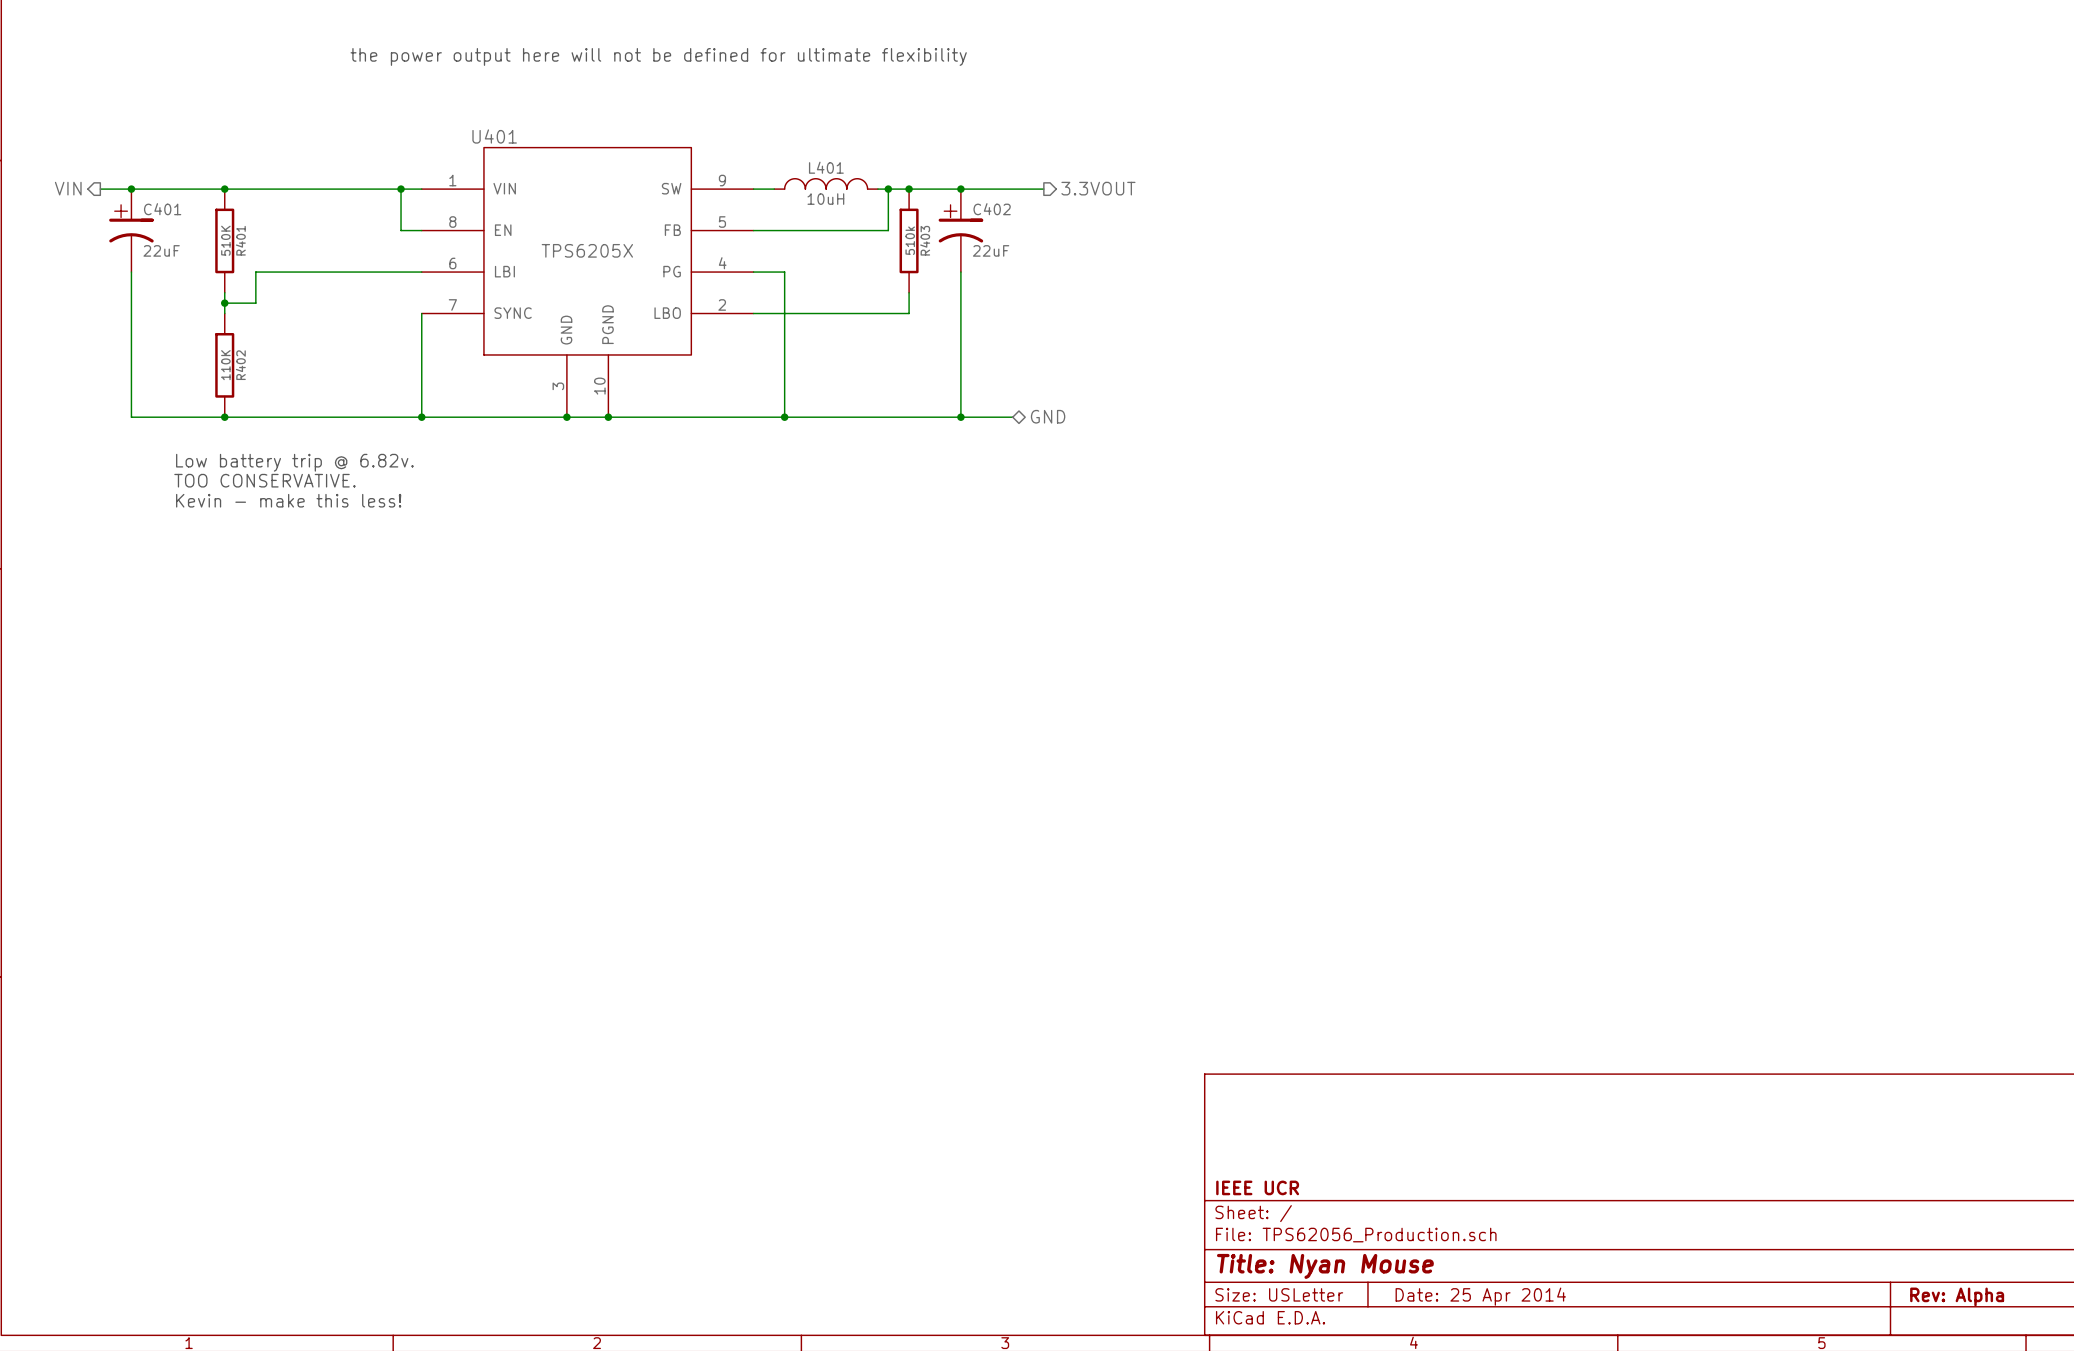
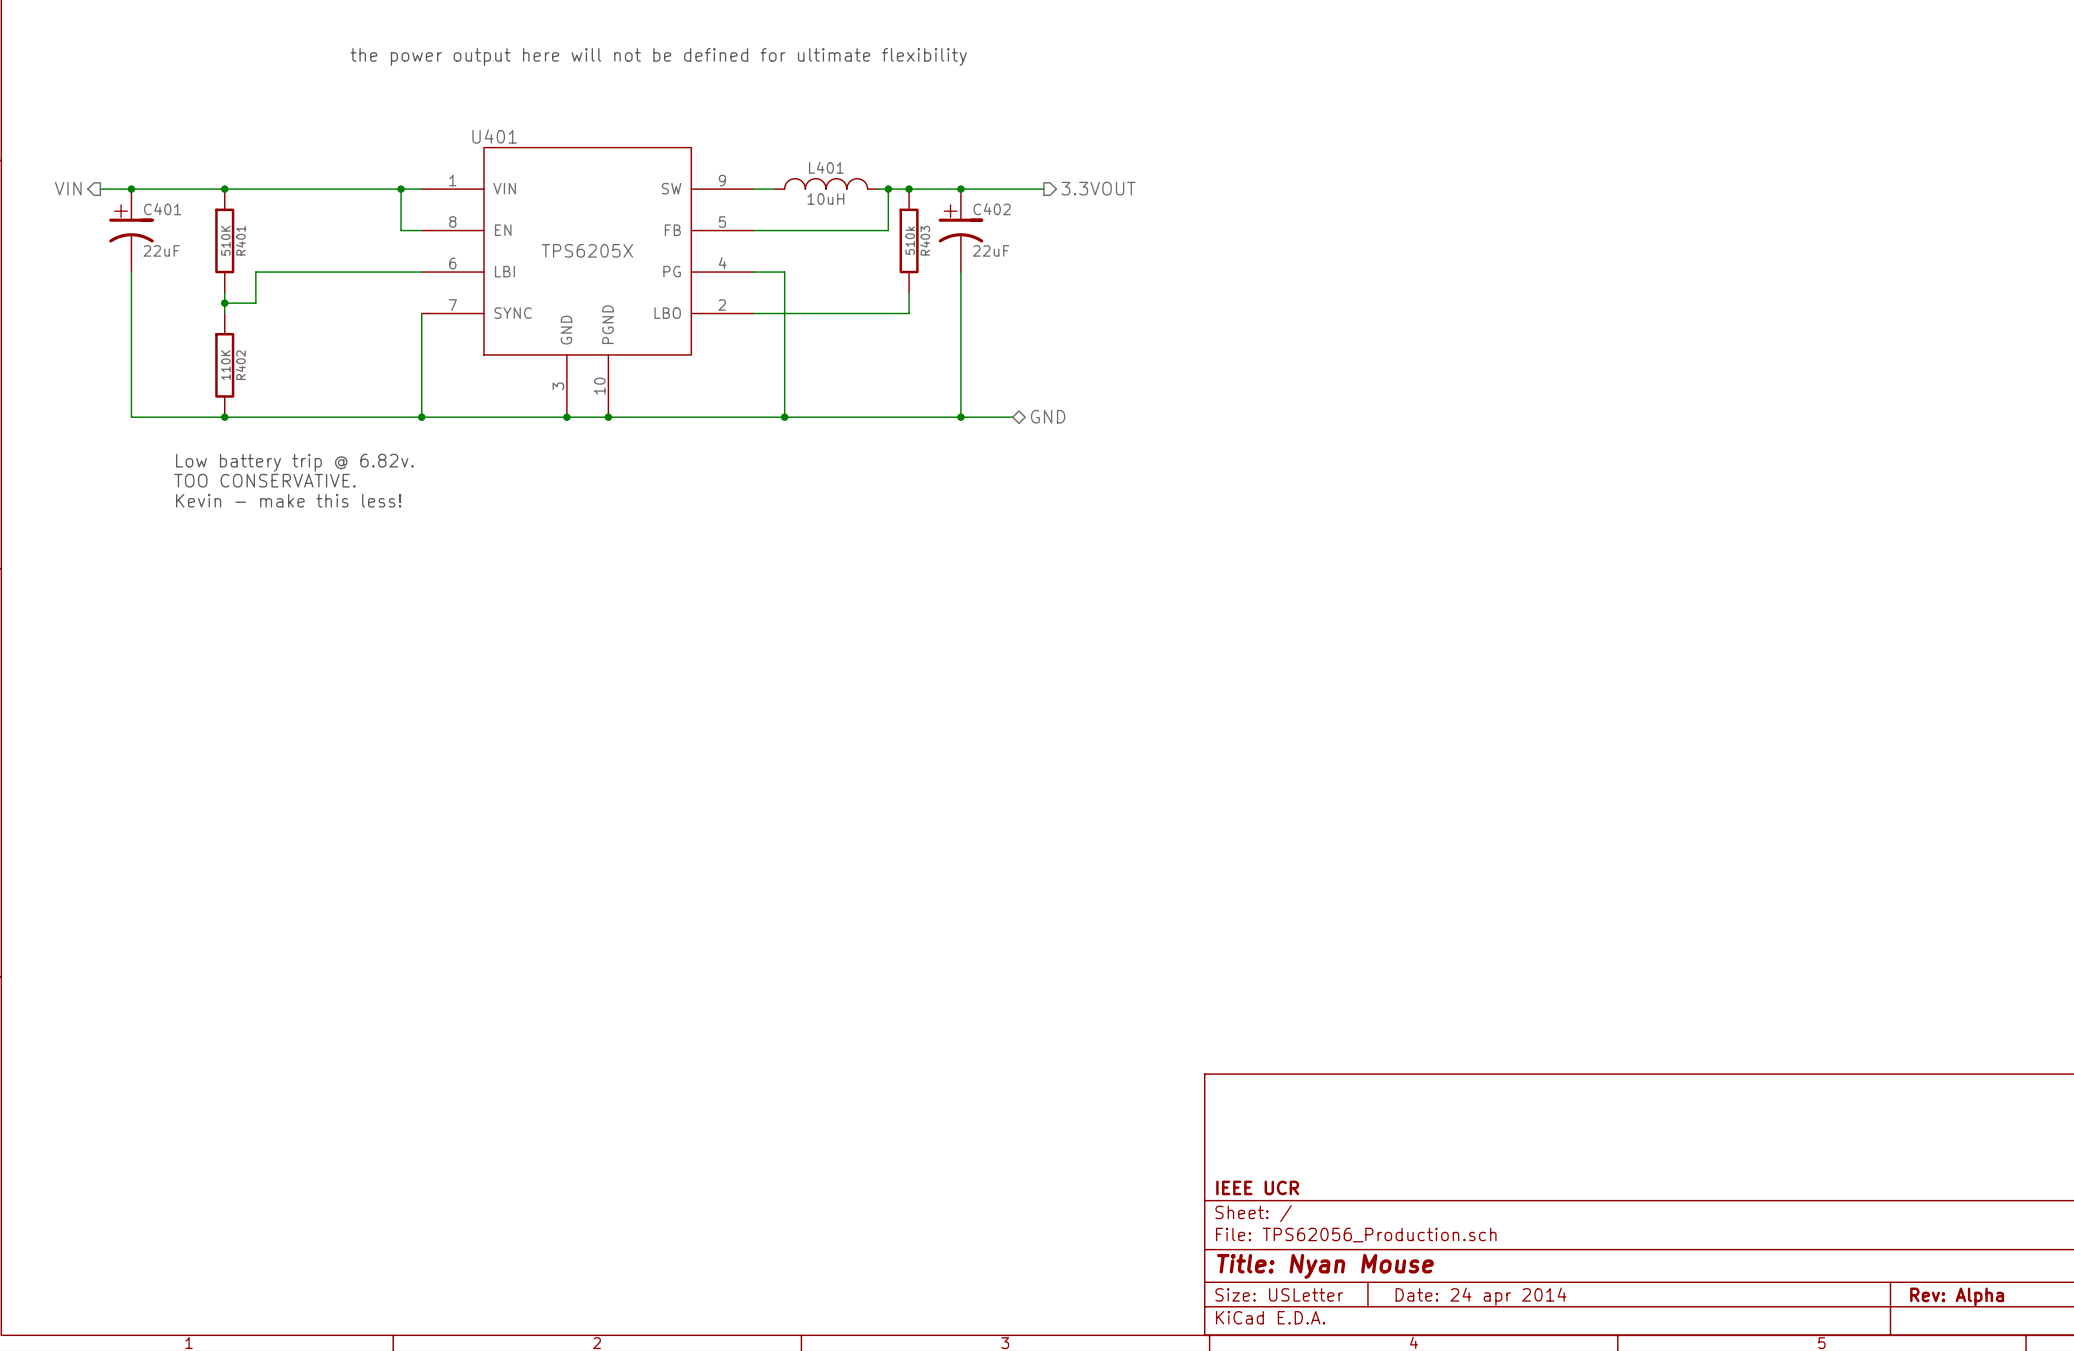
title block: Date: 25 Apr 2014 (1480, 1296) -> Date: 24 apr 2014 (1481, 1296)

